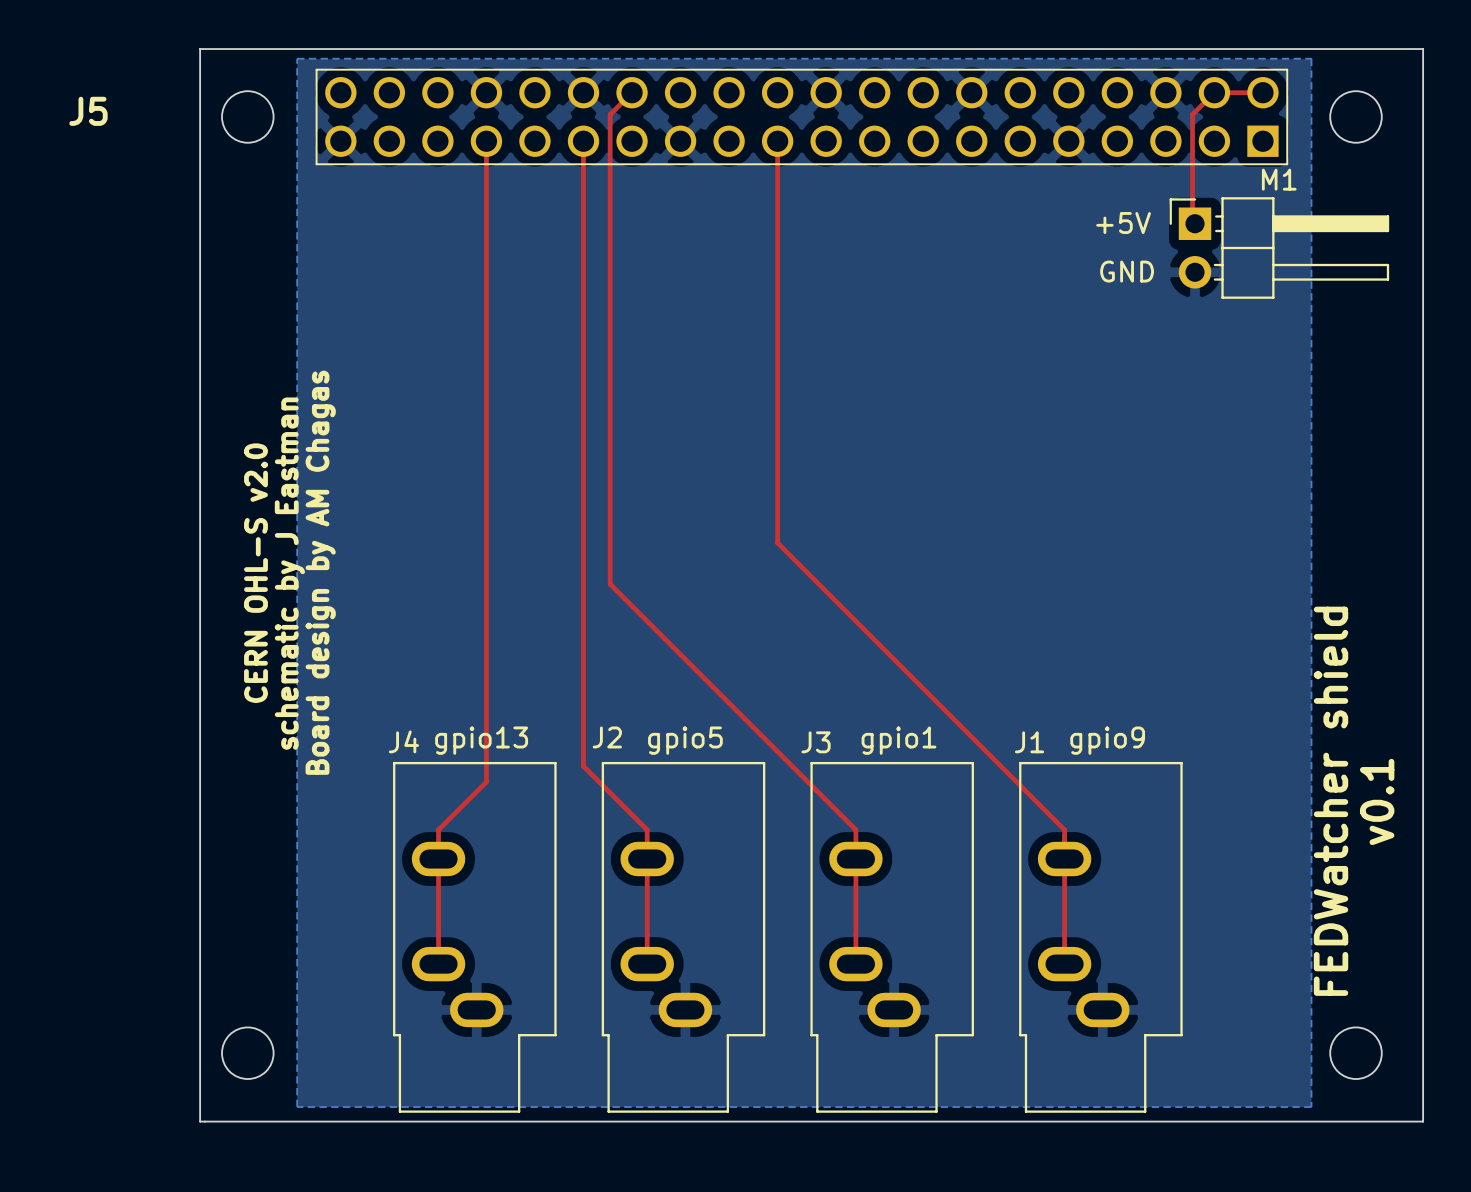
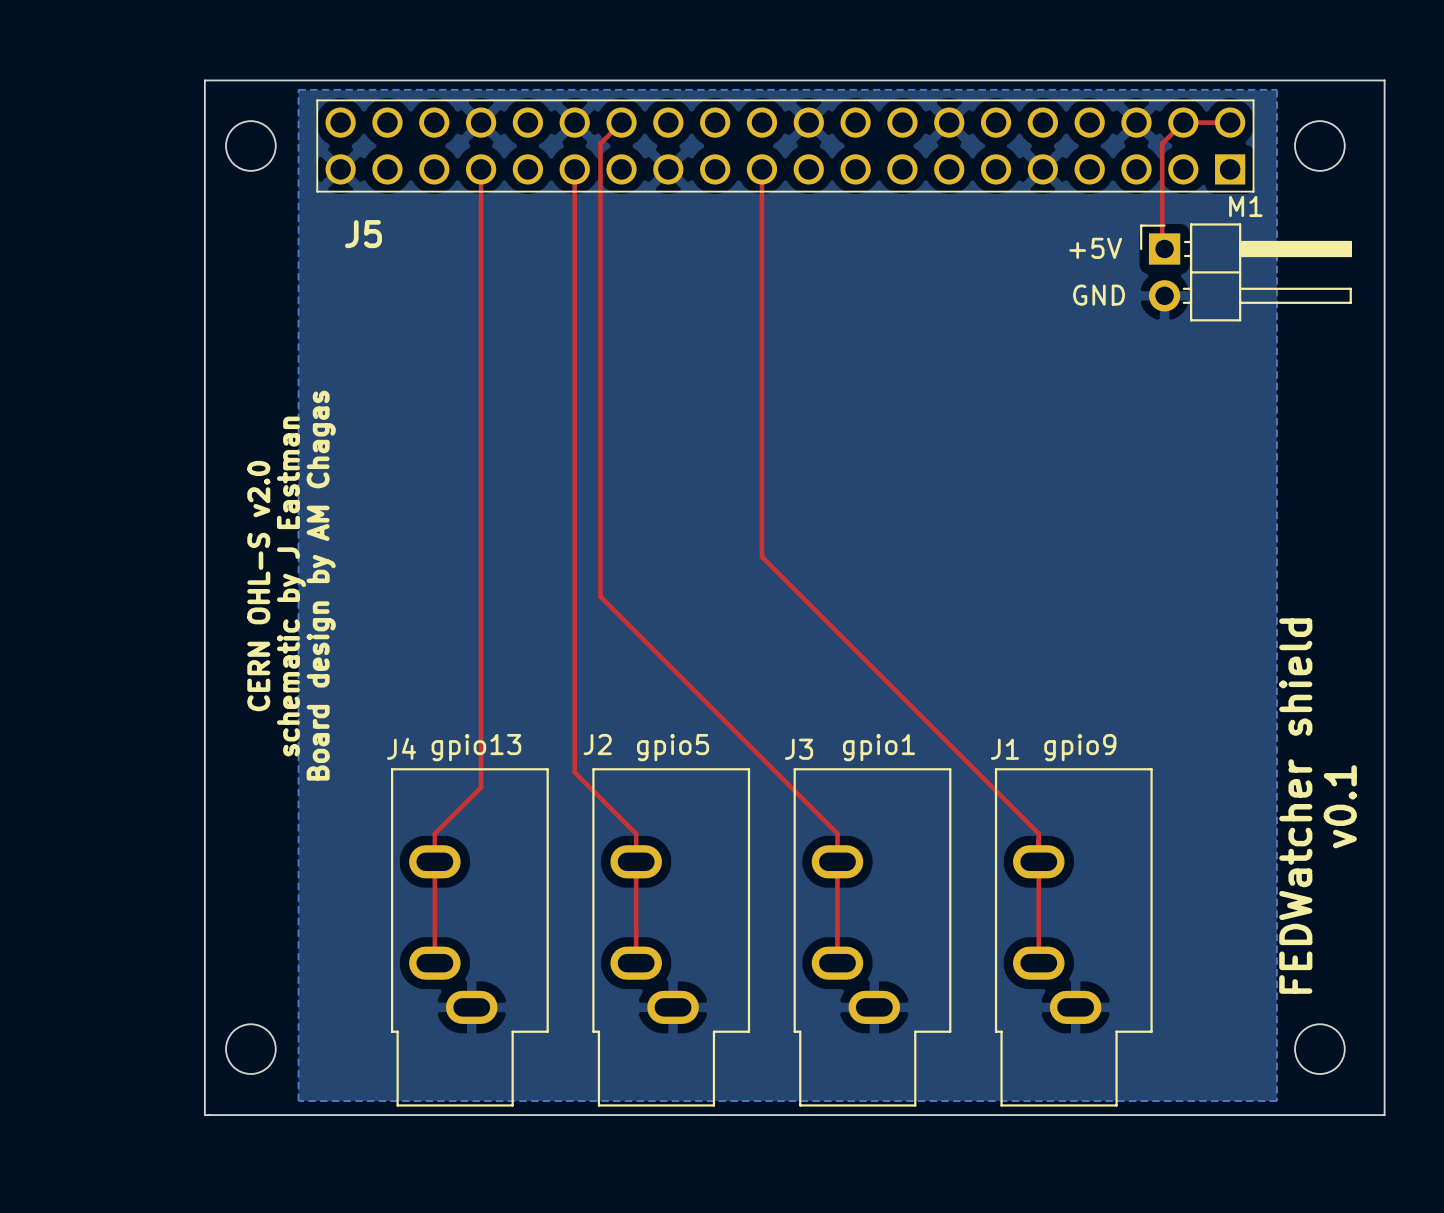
J5 name position: J5 (88, 111) -> J5 (363, 234)

